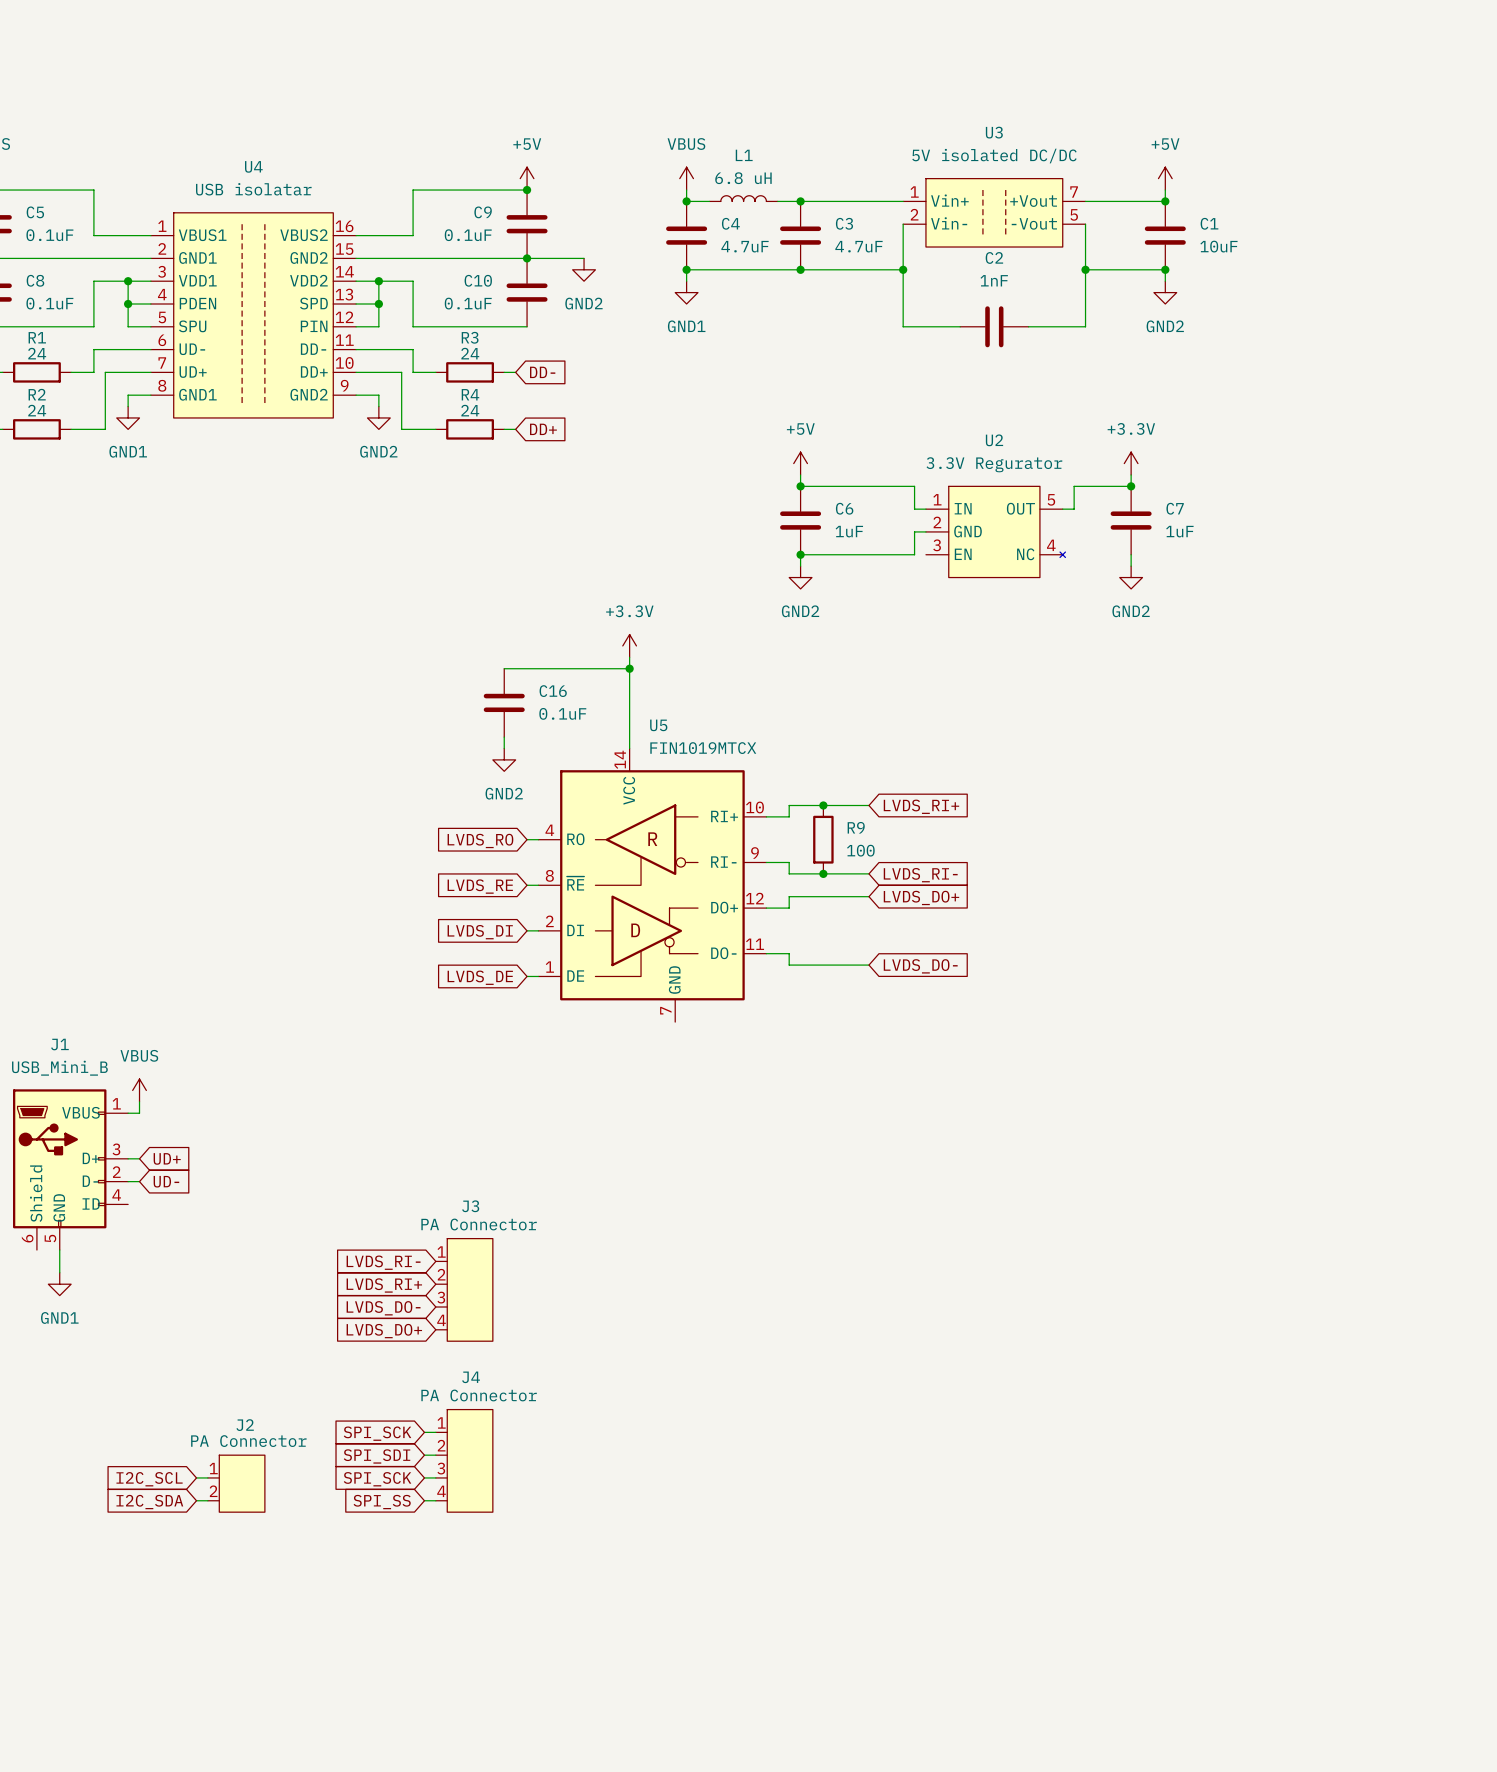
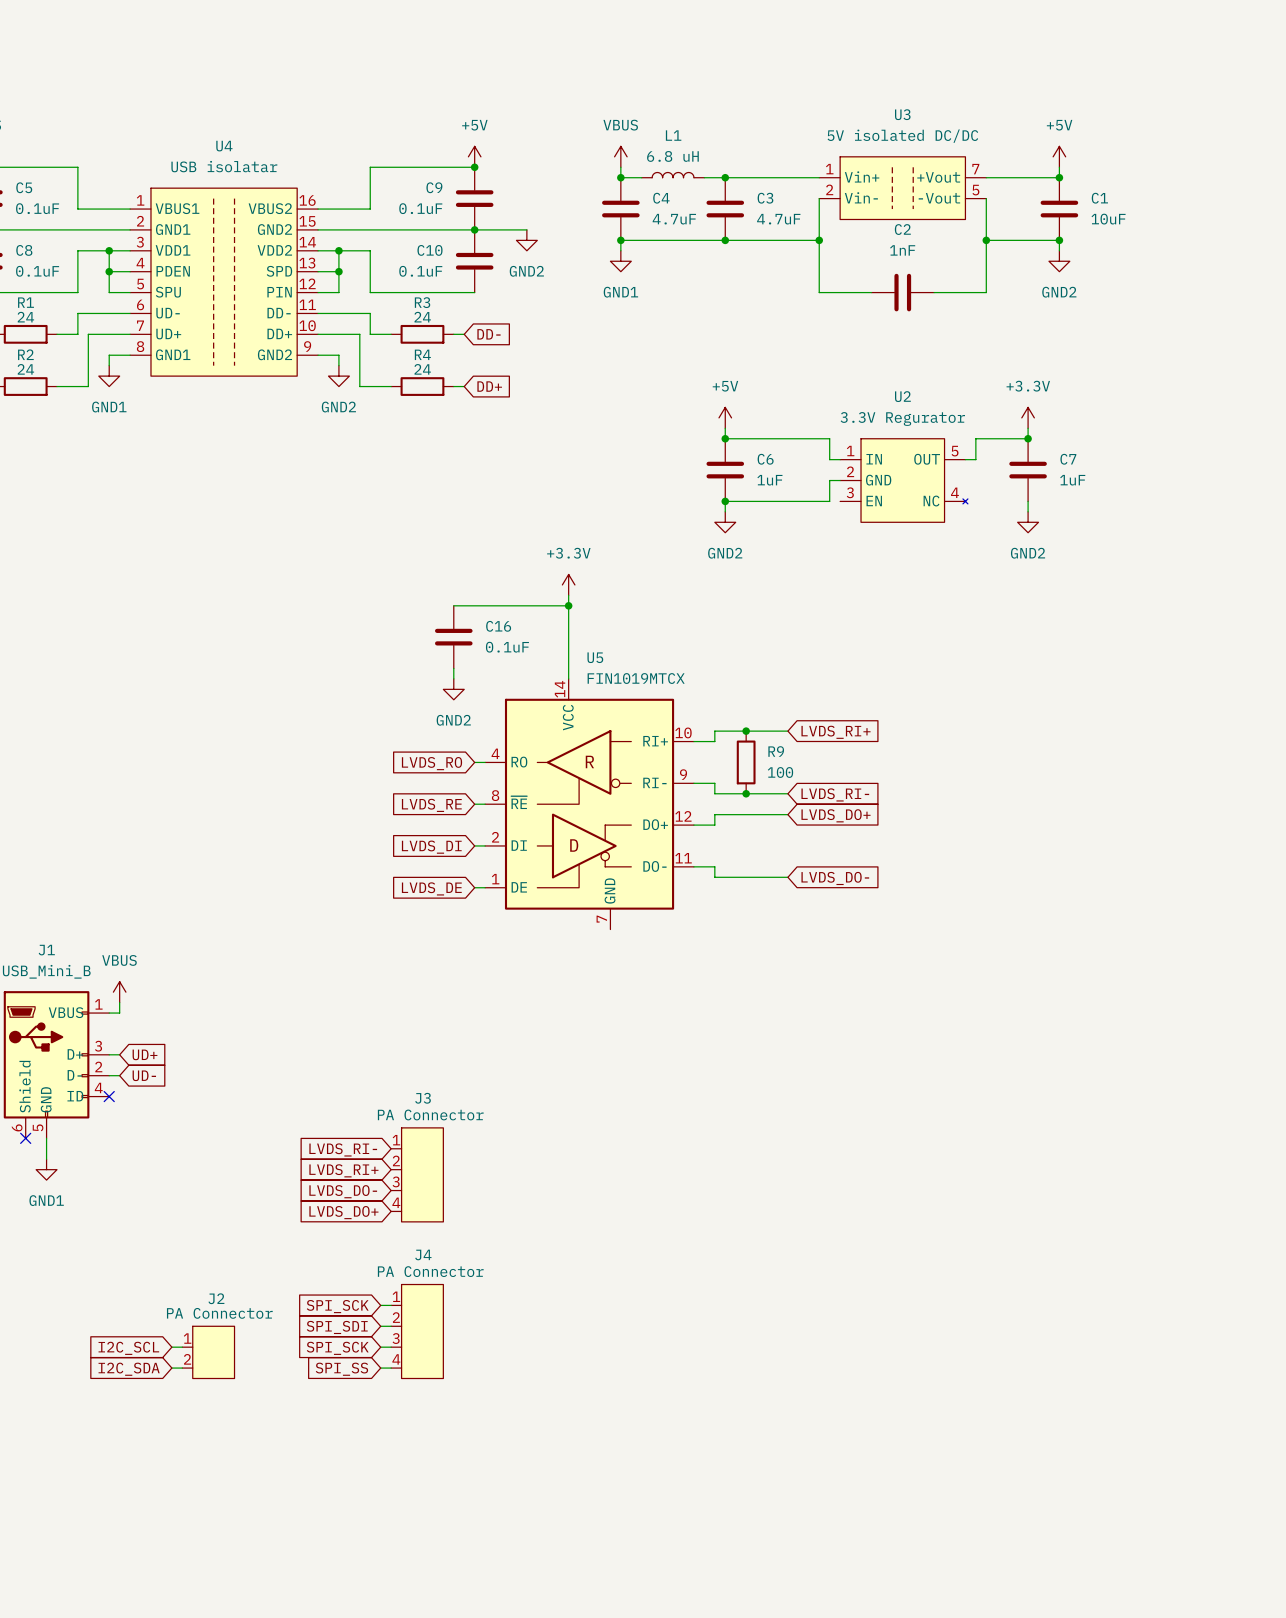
no-connect mark: none -> (109, 1096)
no-connect mark: none -> (25, 1138)

